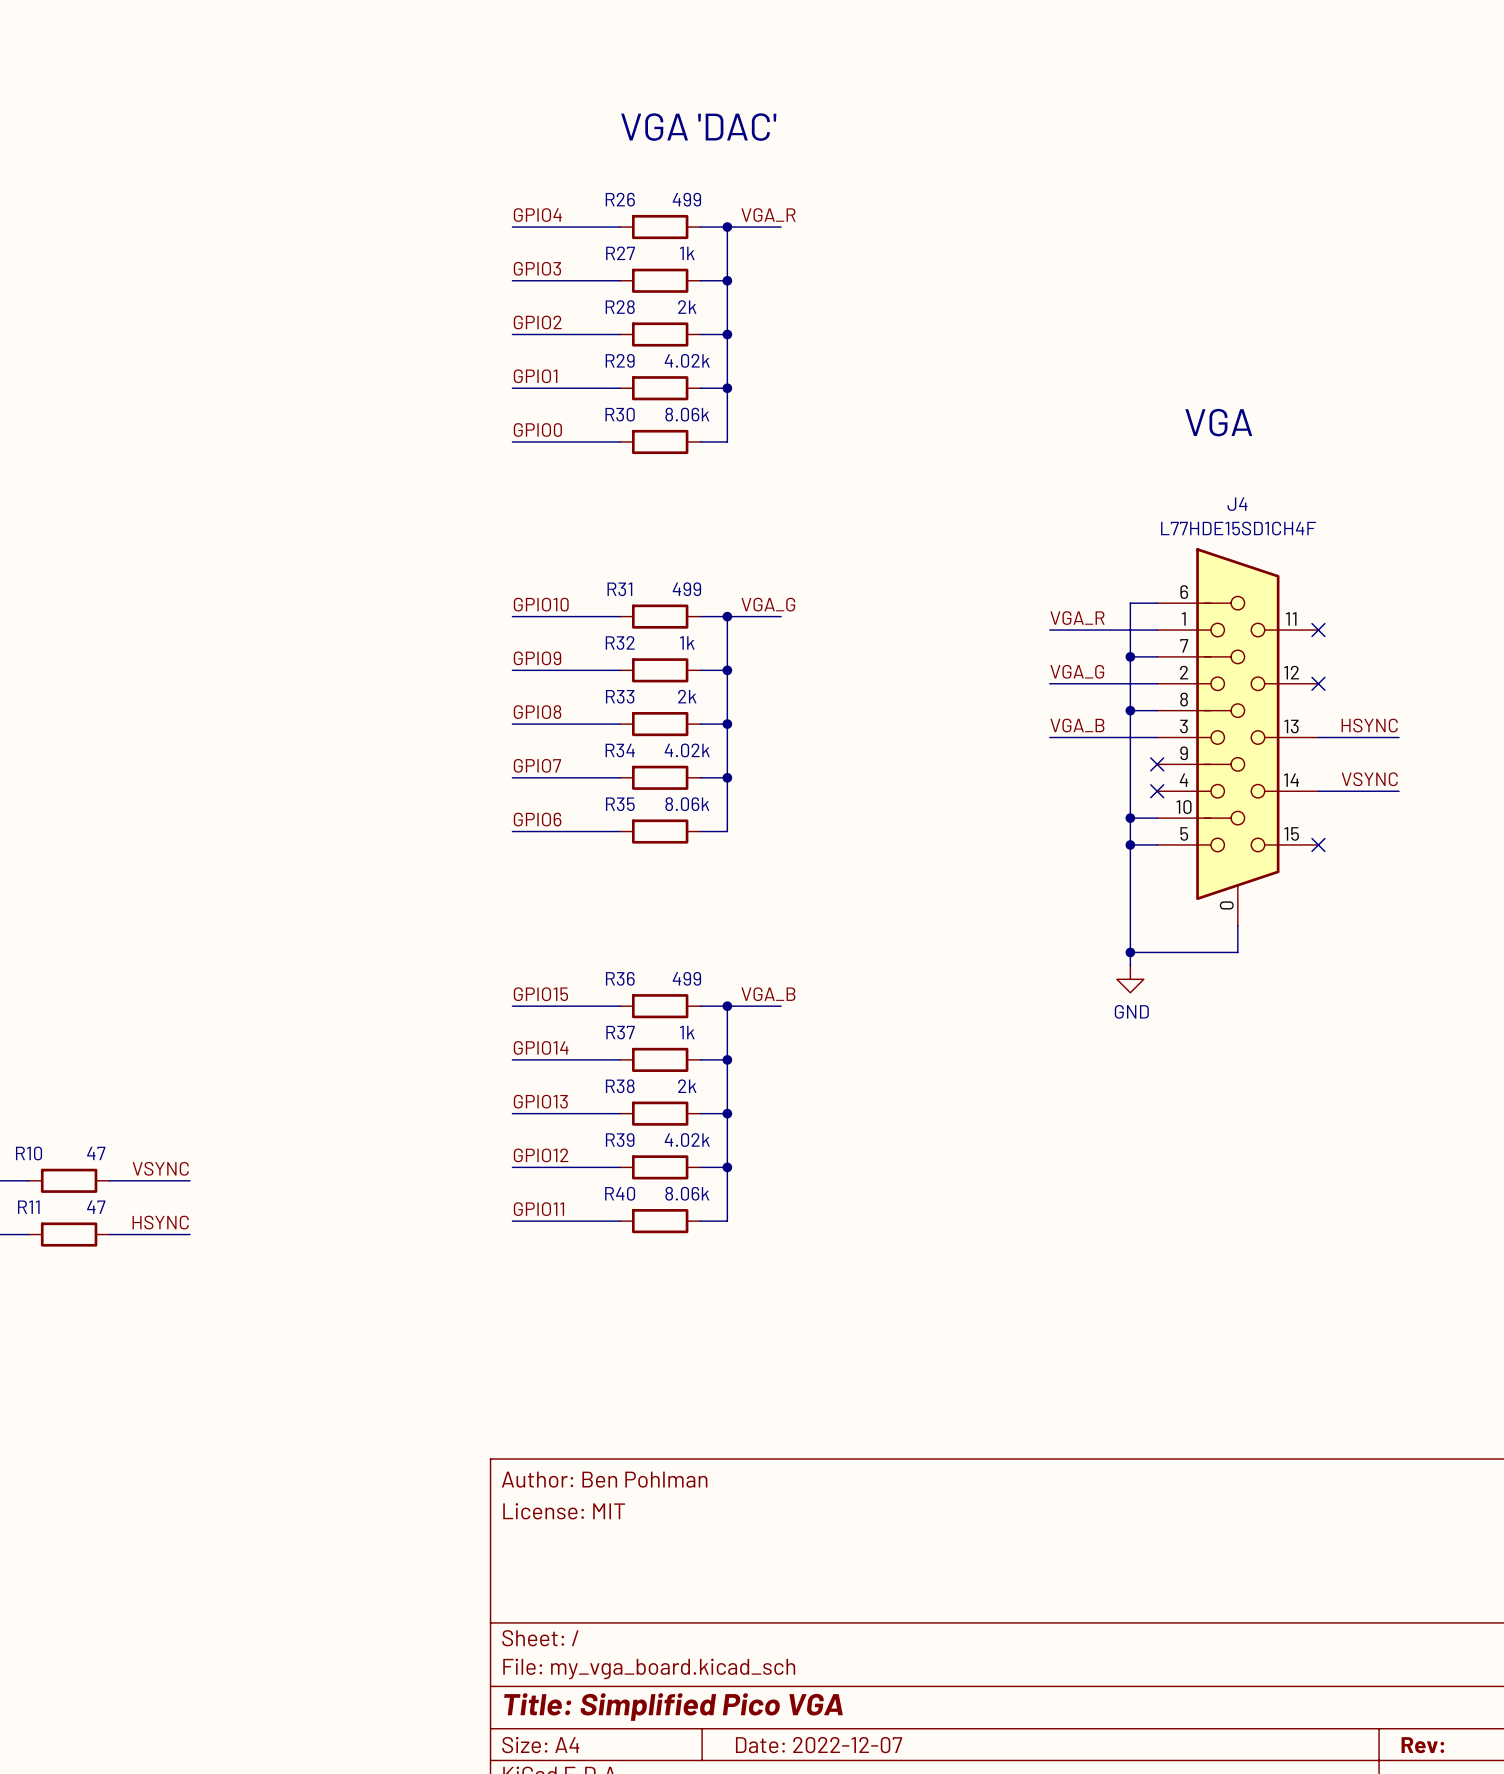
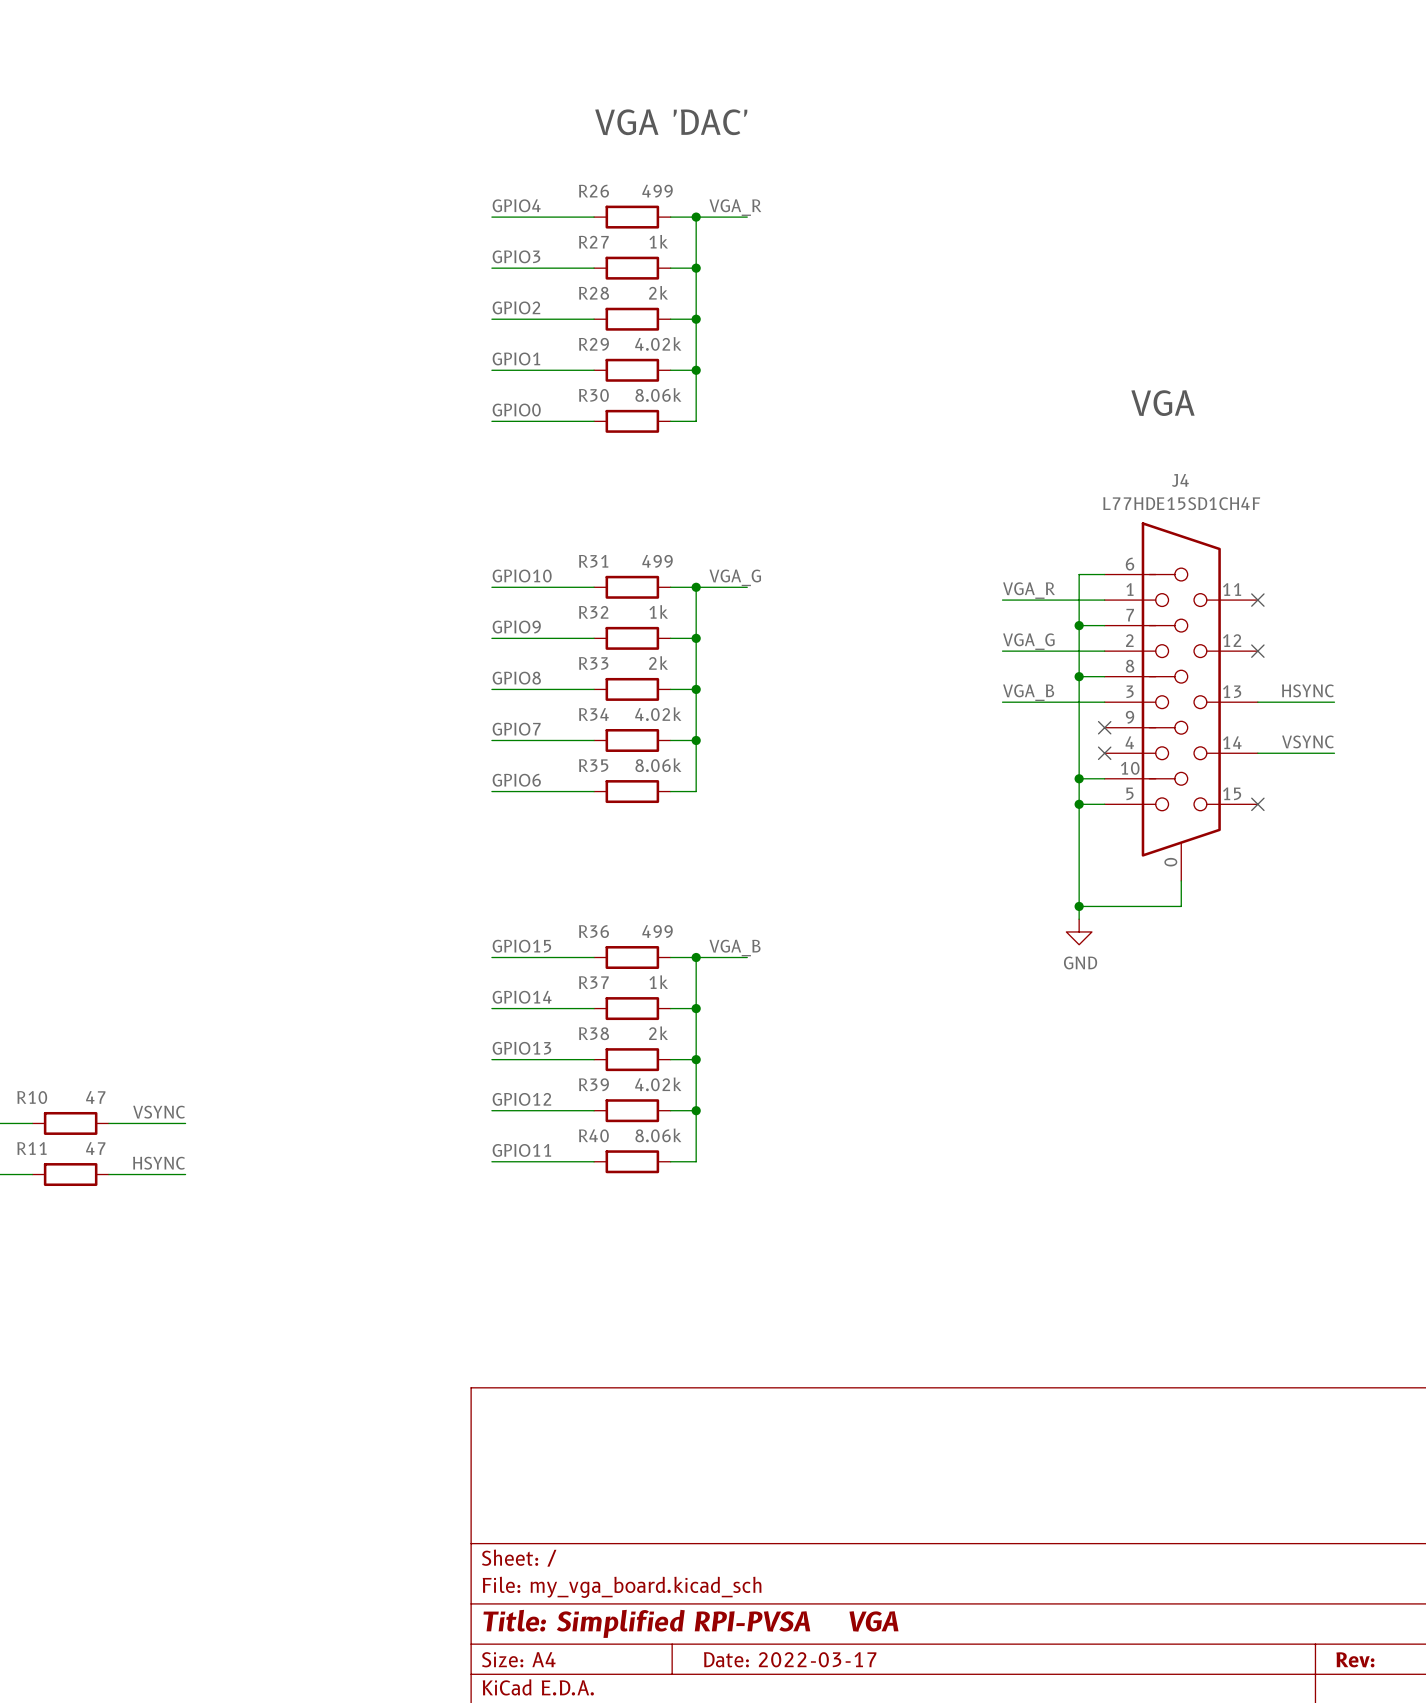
title block: Author: Ben Pohlman (604, 1479) -> none
title block: License: MIT (564, 1511) -> none
title block: Title: Simplified Pico VGA (673, 1707) -> Title: Simplified RPI-PVSA VGA (690, 1623)
title block: Date: 2022-12-07 (819, 1745) -> Date: 2022-03-17 (790, 1659)

